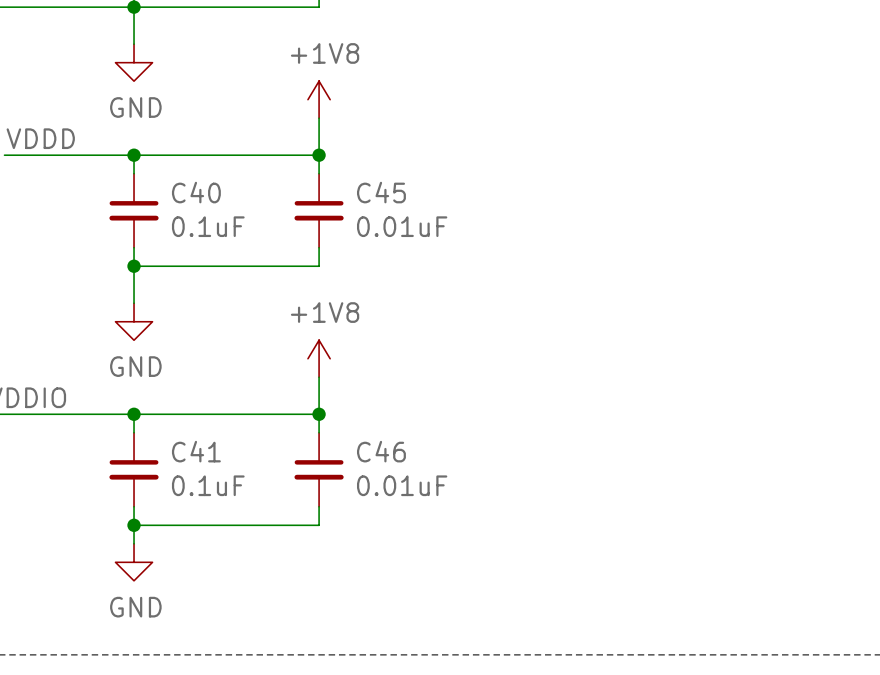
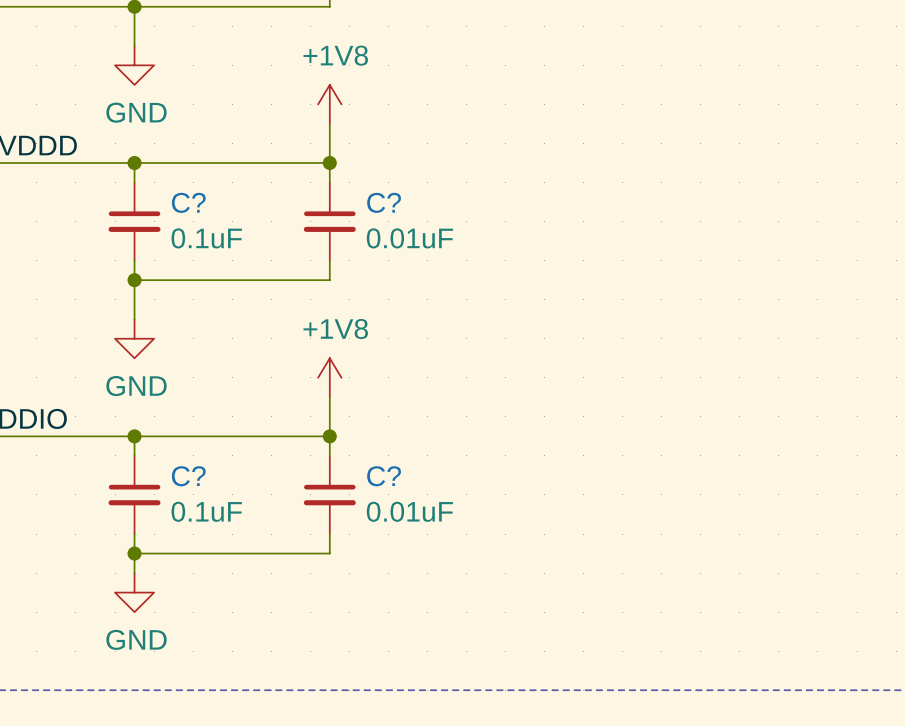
C40 name: C40 (196, 192) -> C? (188, 202)
C45 name: C45 (381, 192) -> C? (384, 202)
C41 name: C41 (196, 451) -> C? (188, 476)
C46 name: C46 (381, 451) -> C? (384, 476)

